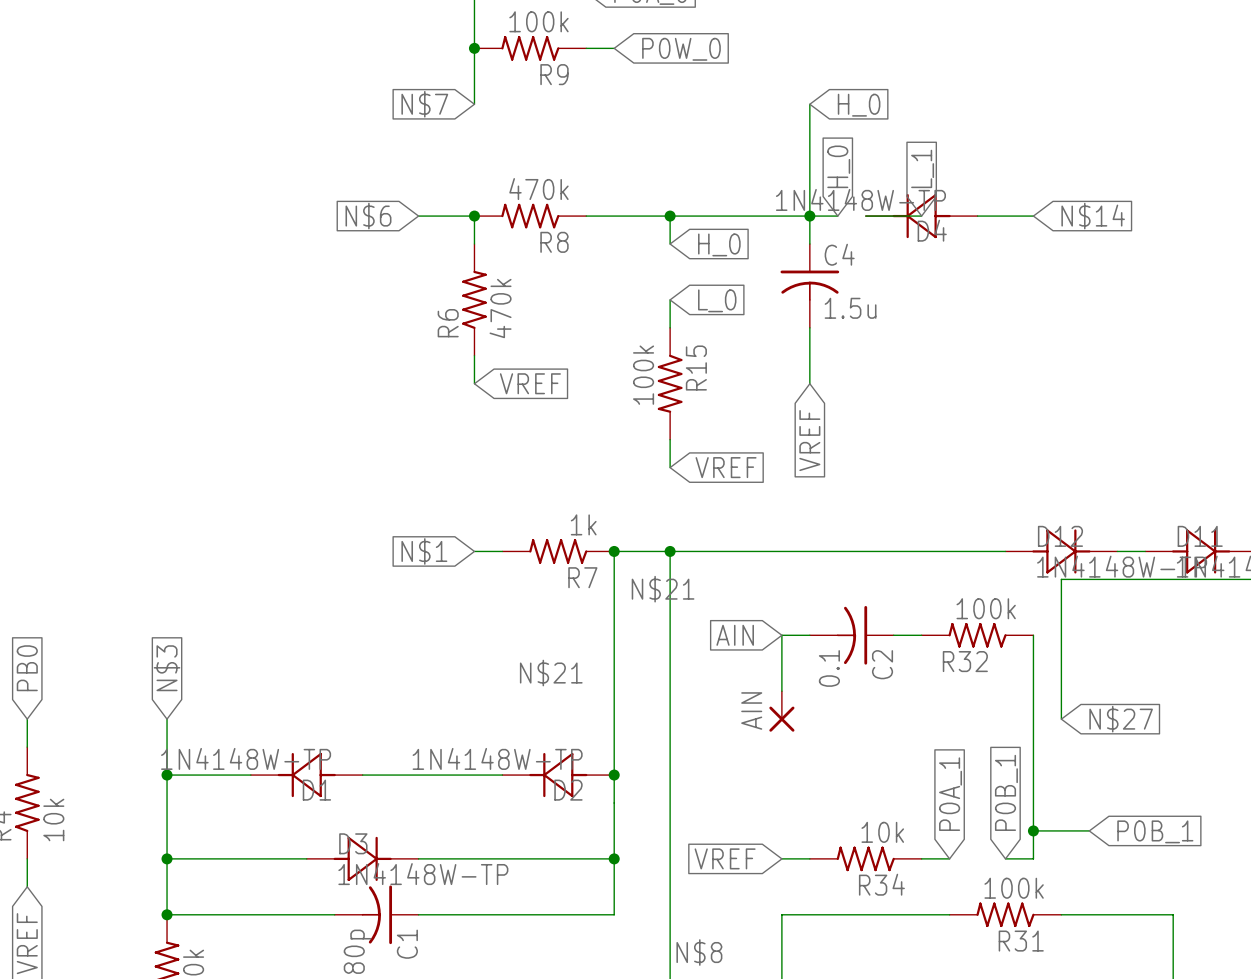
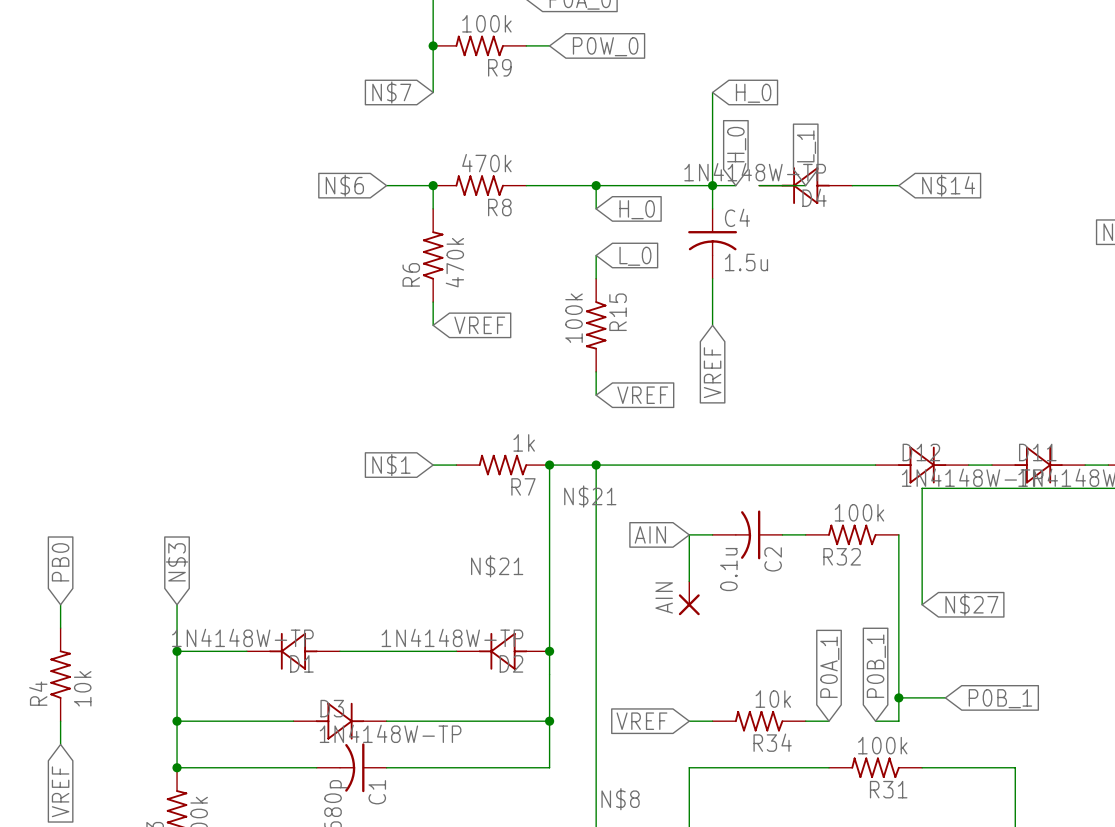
C2 value: 0.1 (829, 668) -> 0.1u (728, 569)

